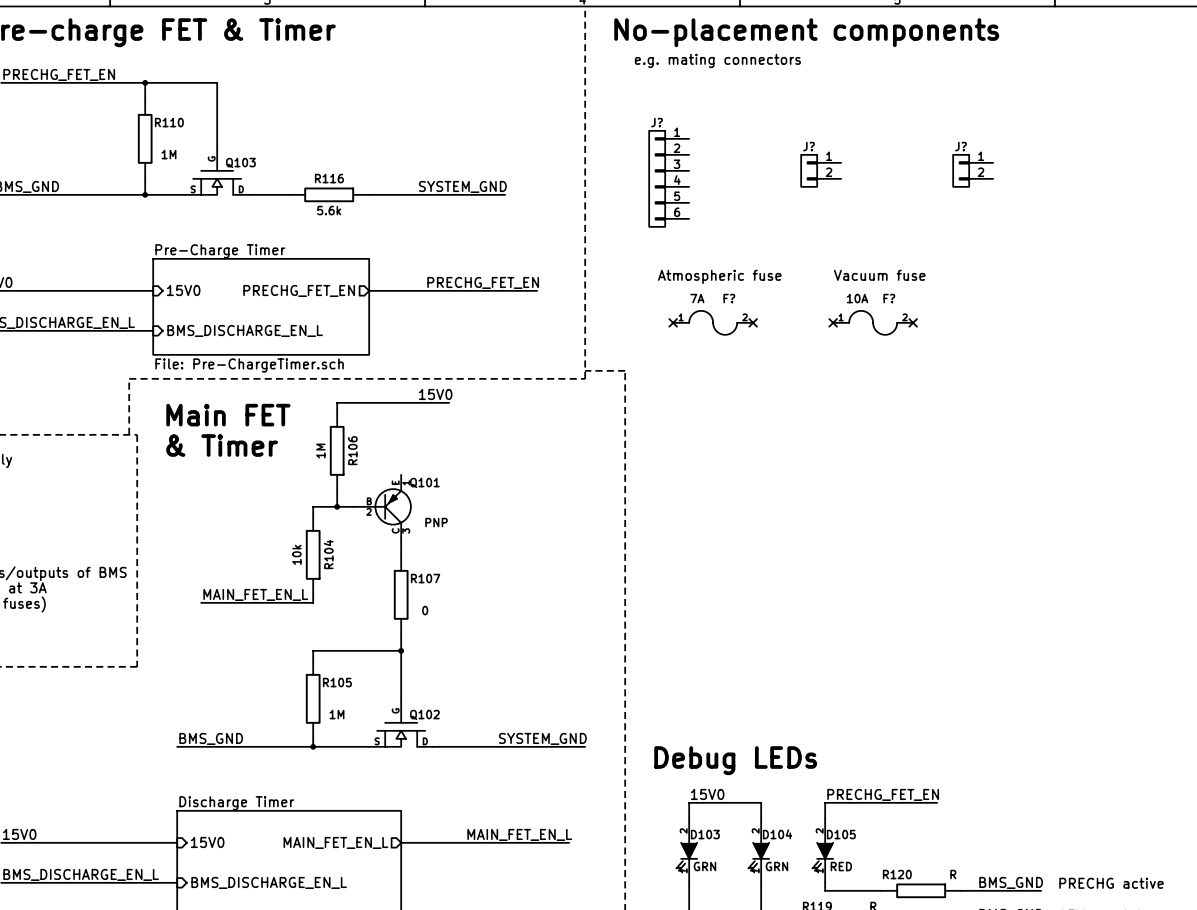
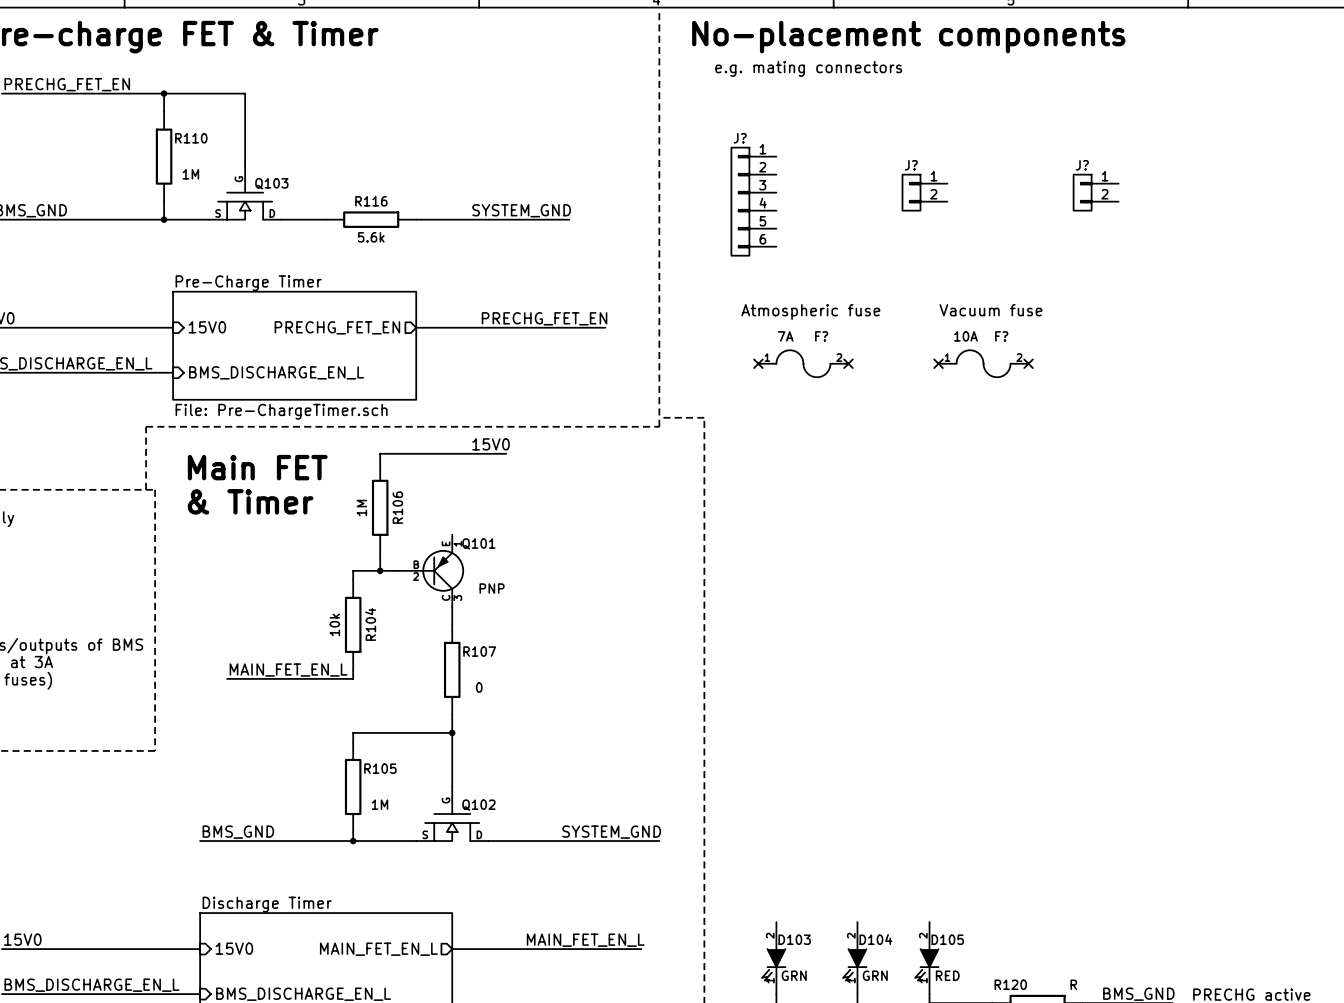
text: Debug LEDs (735, 760) -> none
label: 15V0 (707, 794) -> none
label: PRECHG_FET_EN (883, 794) -> none
wire: (937, 802) (825, 802) (825, 818) -> none
wire: (689, 818) (689, 802) (761, 802) (761, 818) -> none

